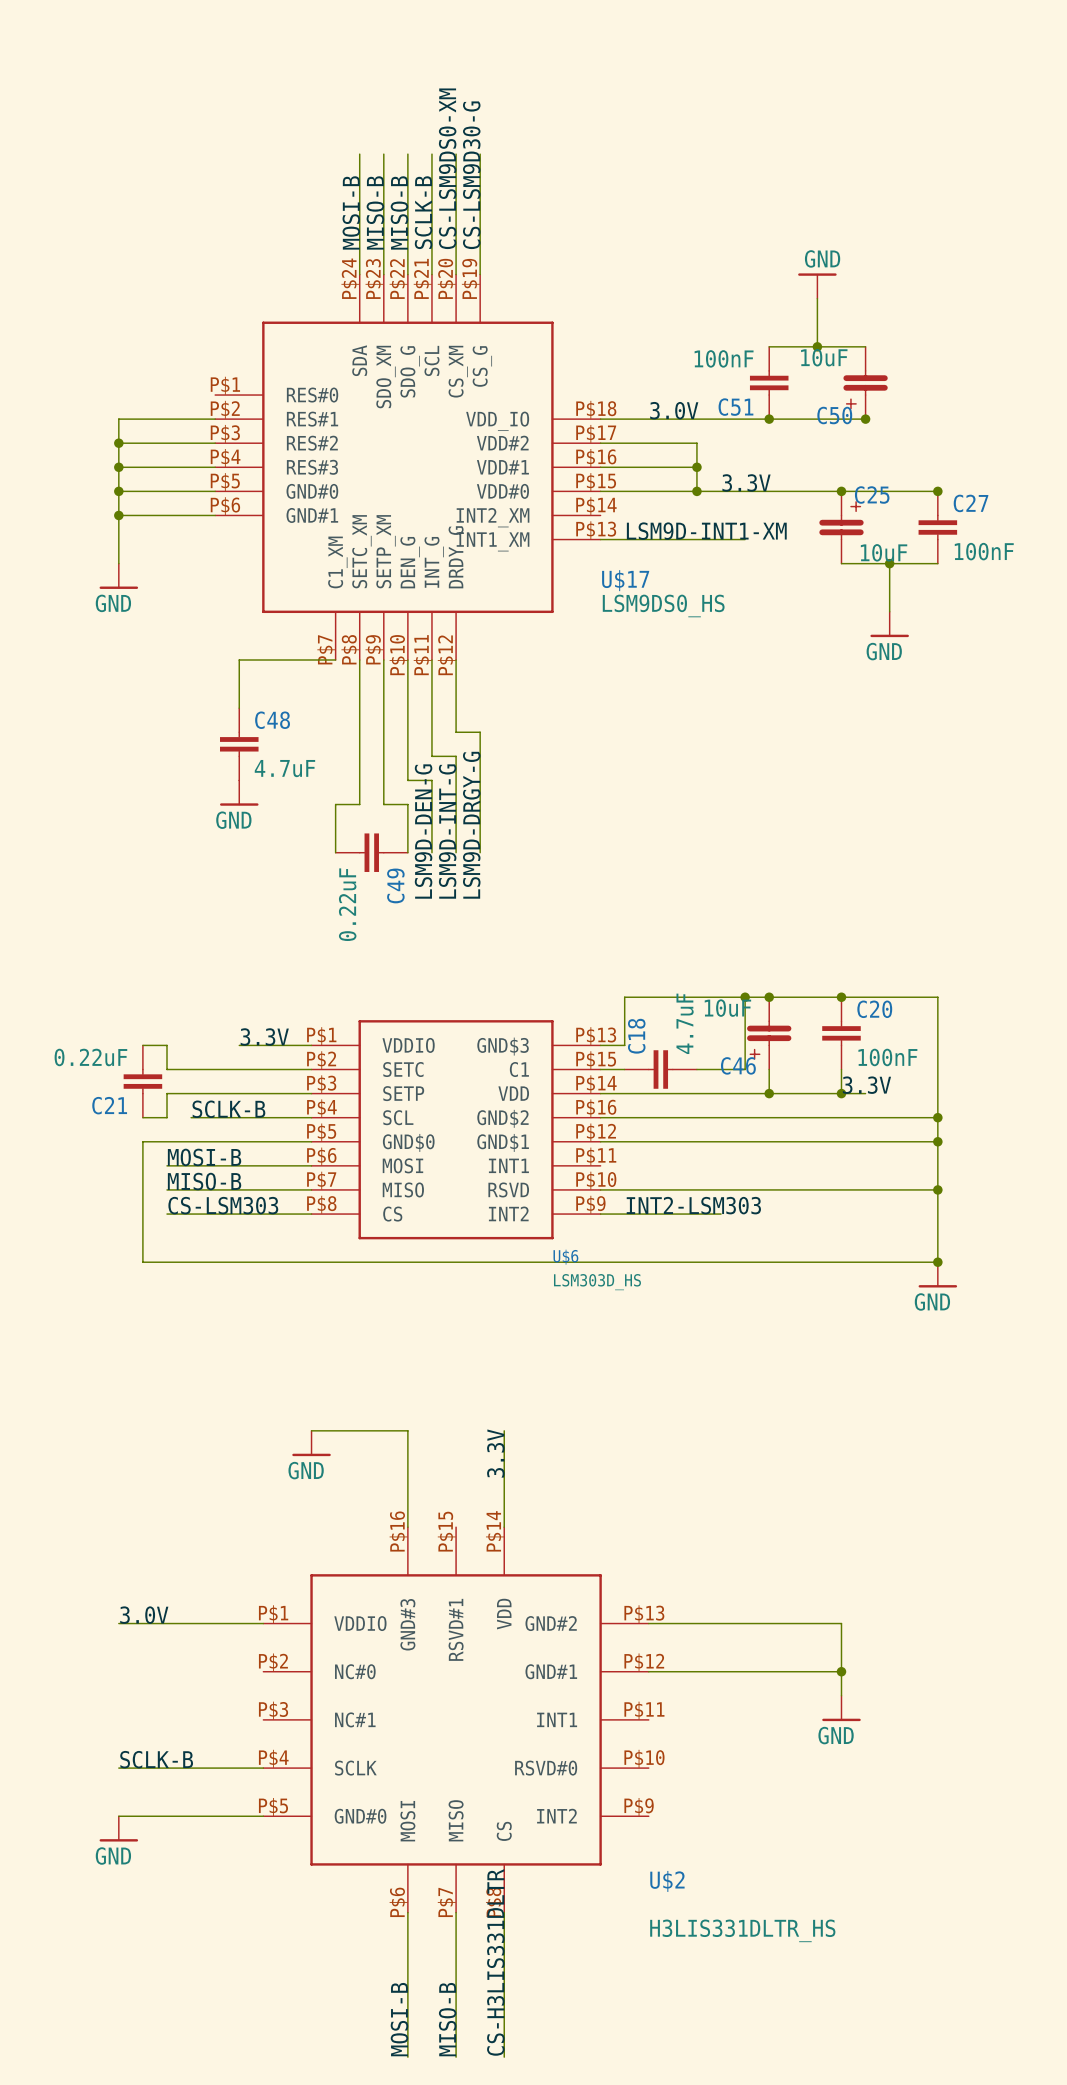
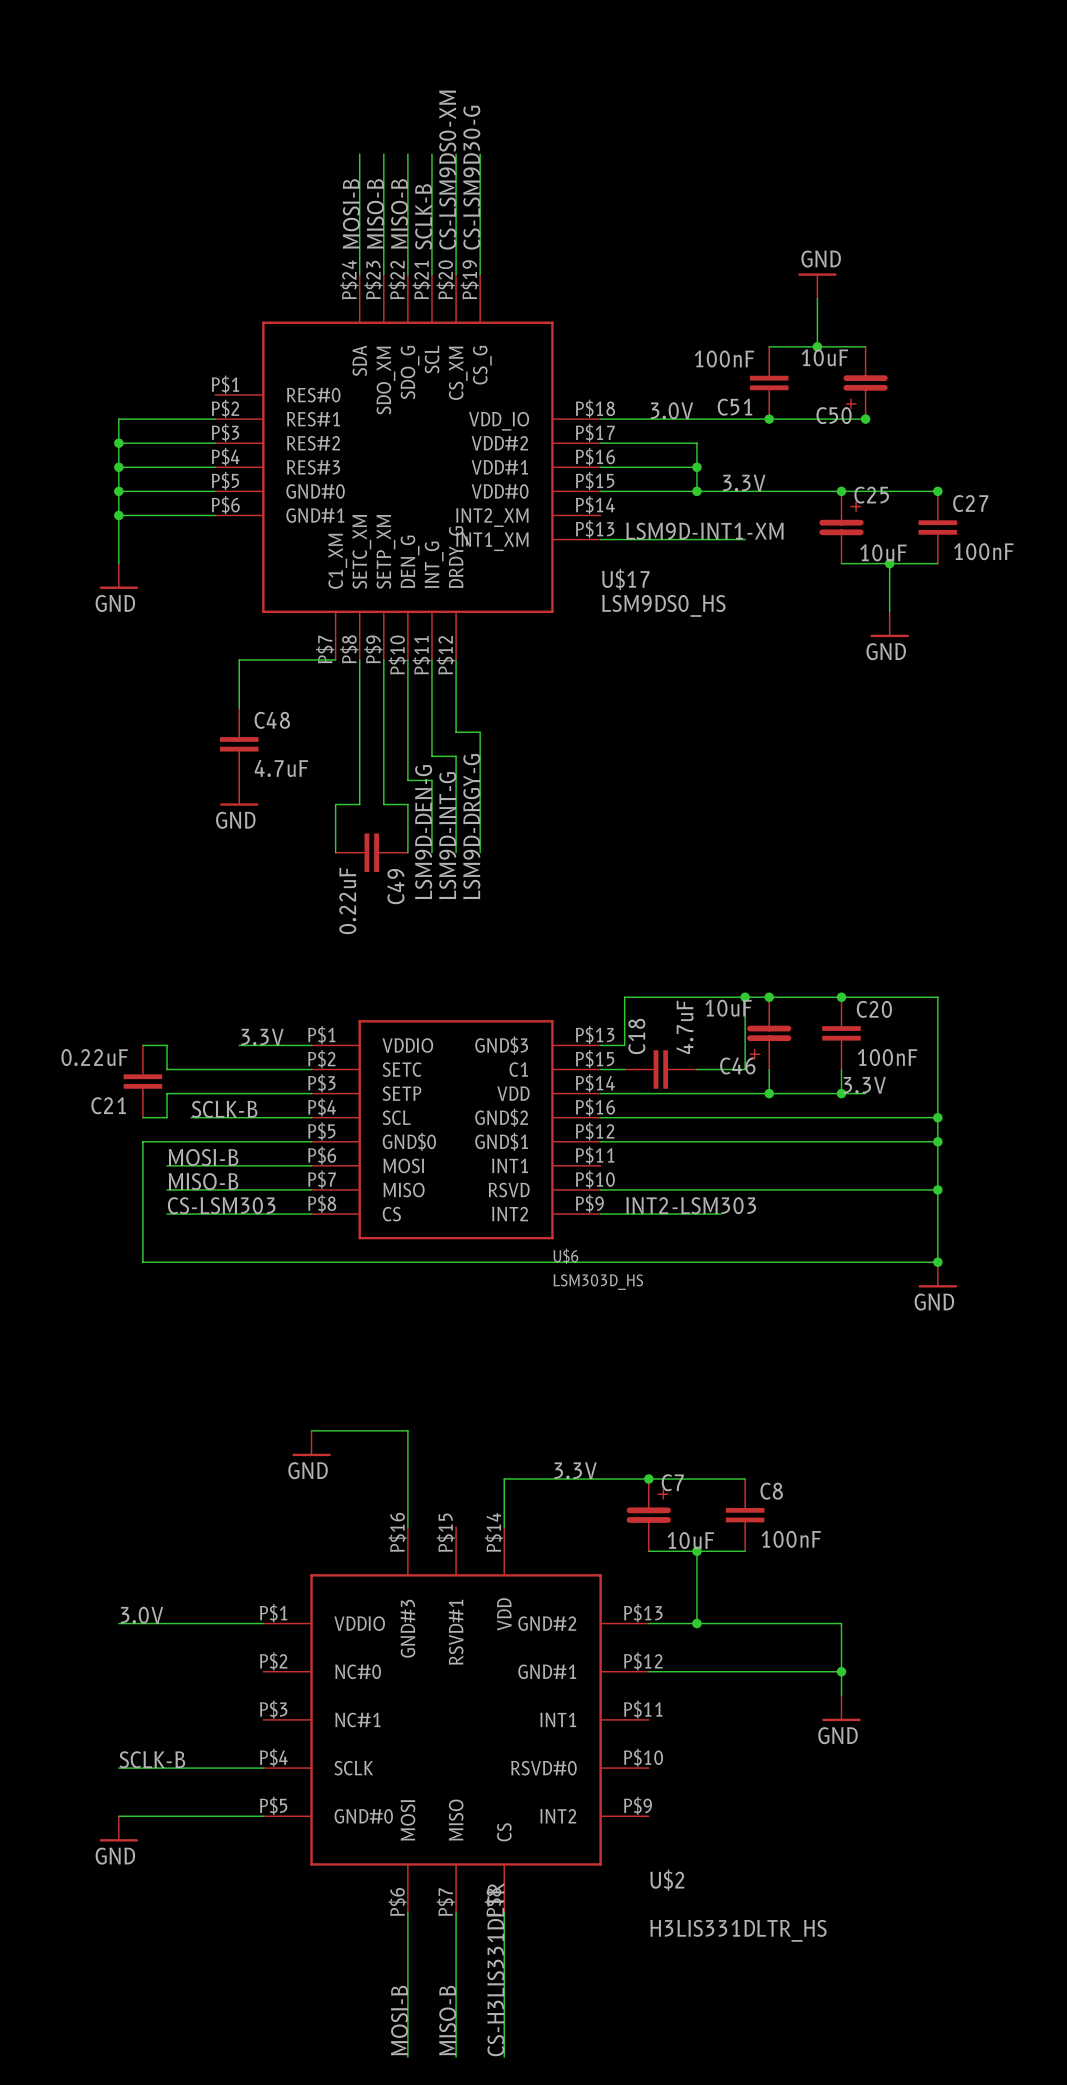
wire: (504, 1430) (504, 1479) -> (745, 1479) (504, 1479)
label rotation: 0° (495, 1453) -> 90° clockwise (575, 1470)
label position: 3.3V (495, 1453) -> 3.3V (575, 1470)
junction: none -> (648, 1479)
C7: none -> 10uF (648, 1515)
C8: none -> 100nF (745, 1515)
wire: none -> (648, 1551) (745, 1551)
wire: none -> (696, 1551) (696, 1623)
junction: none -> (696, 1551)
junction: none -> (696, 1623)

